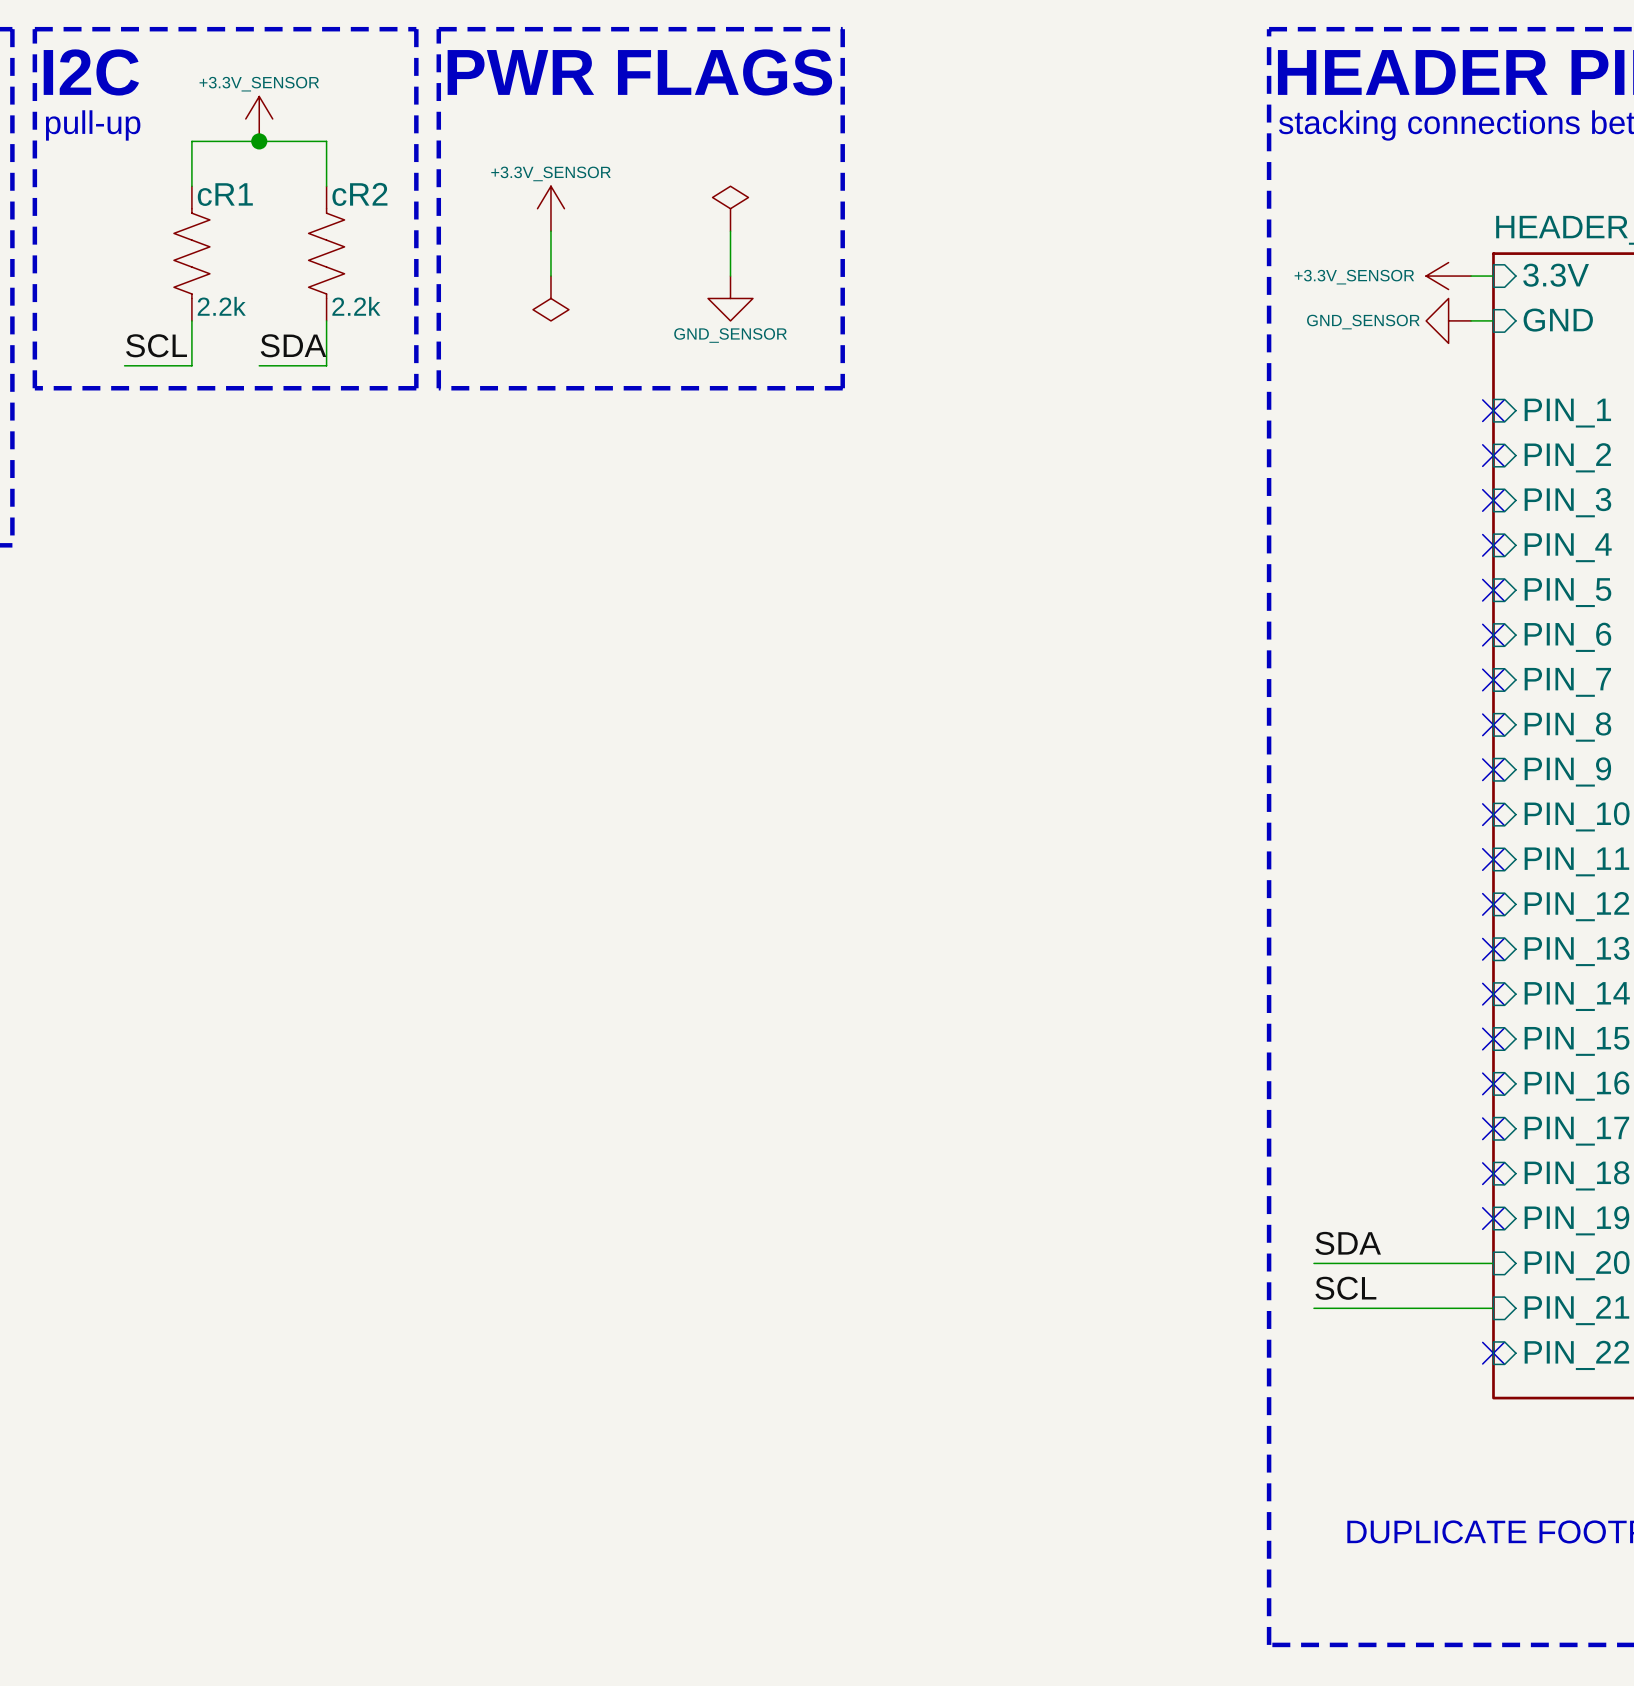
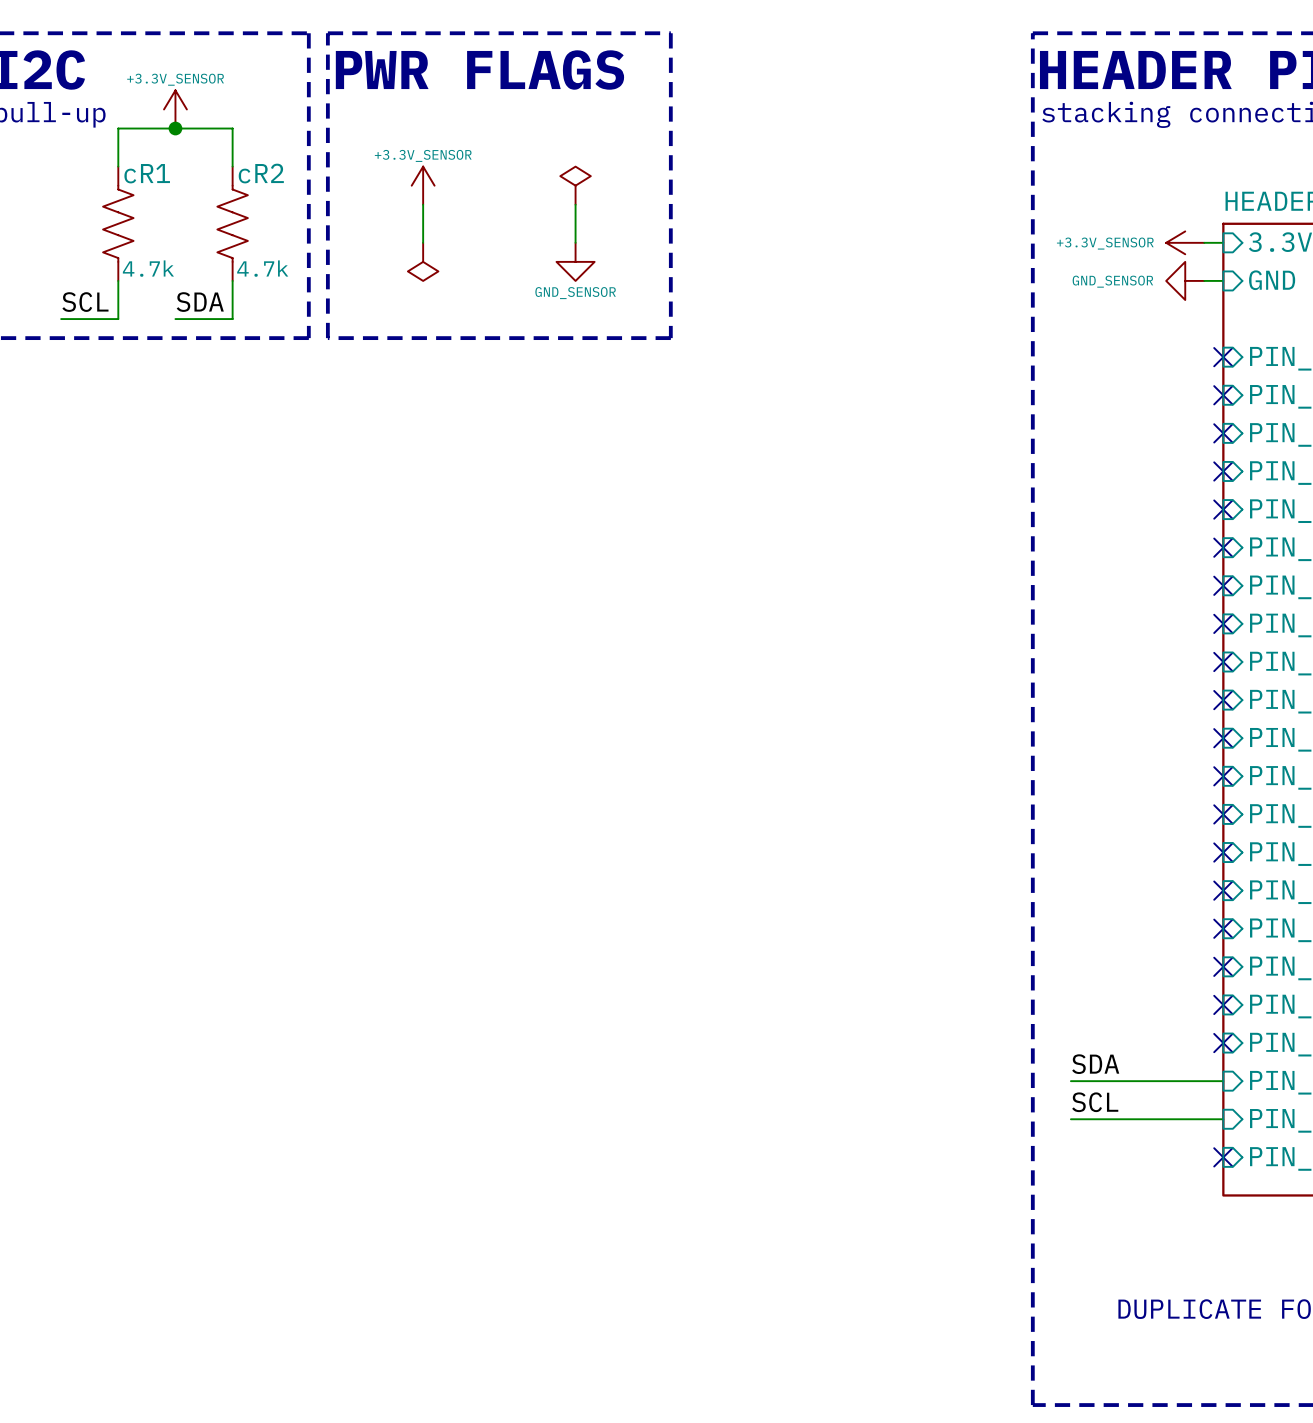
cR1 value: 2.2k (221, 306) -> 4.7k (148, 268)
cR2 value: 2.2k (356, 306) -> 4.7k (262, 268)

